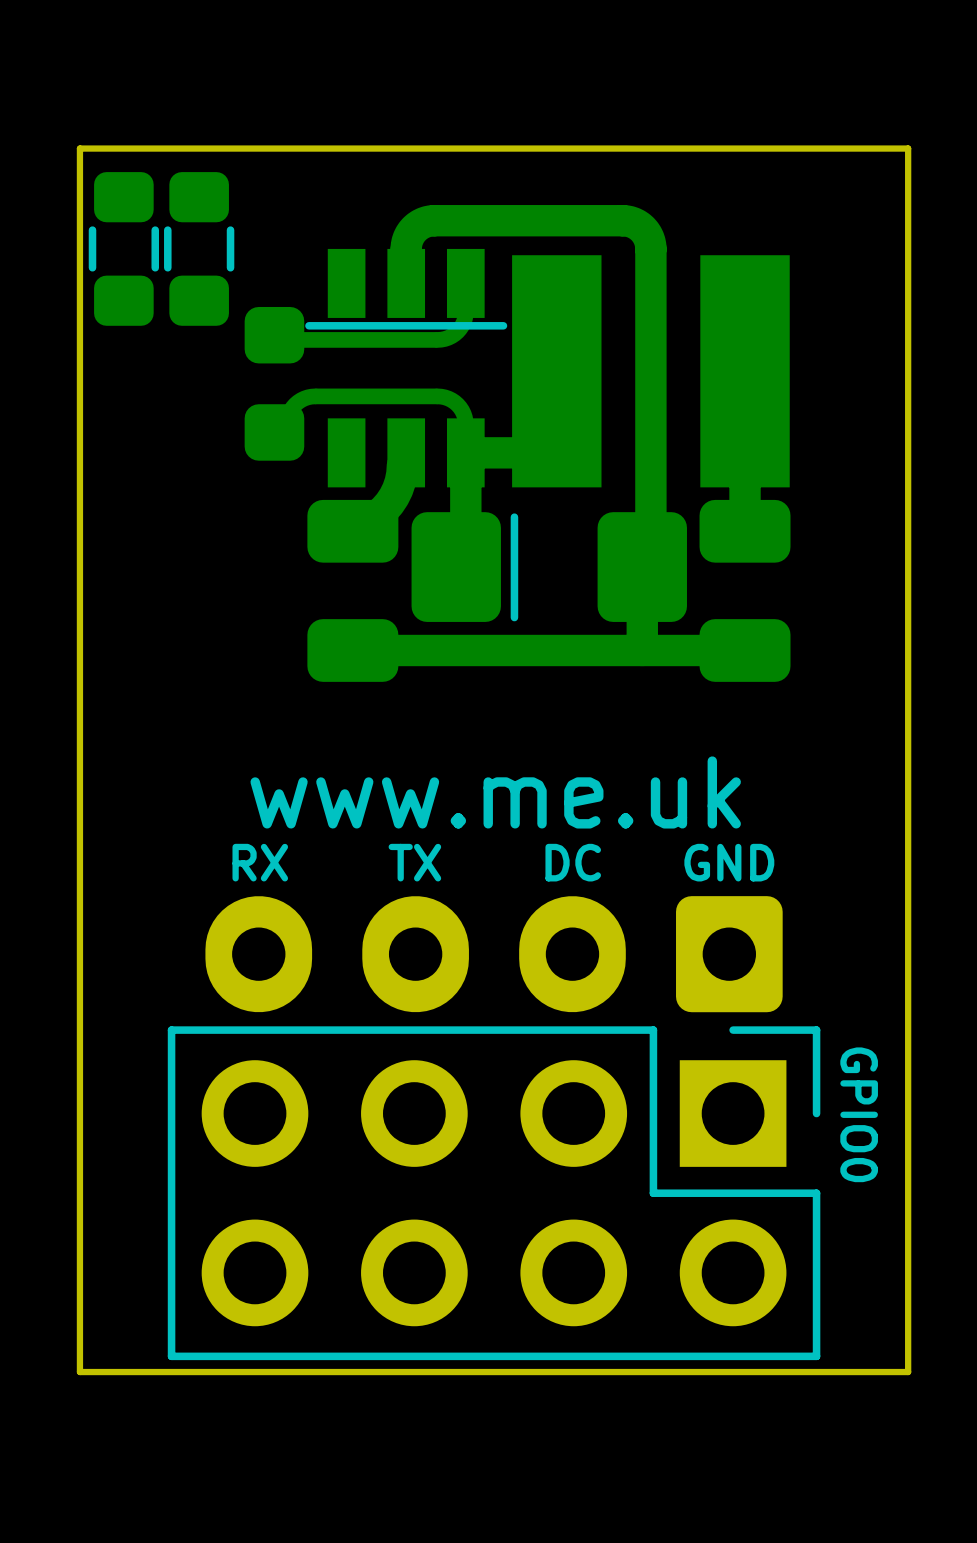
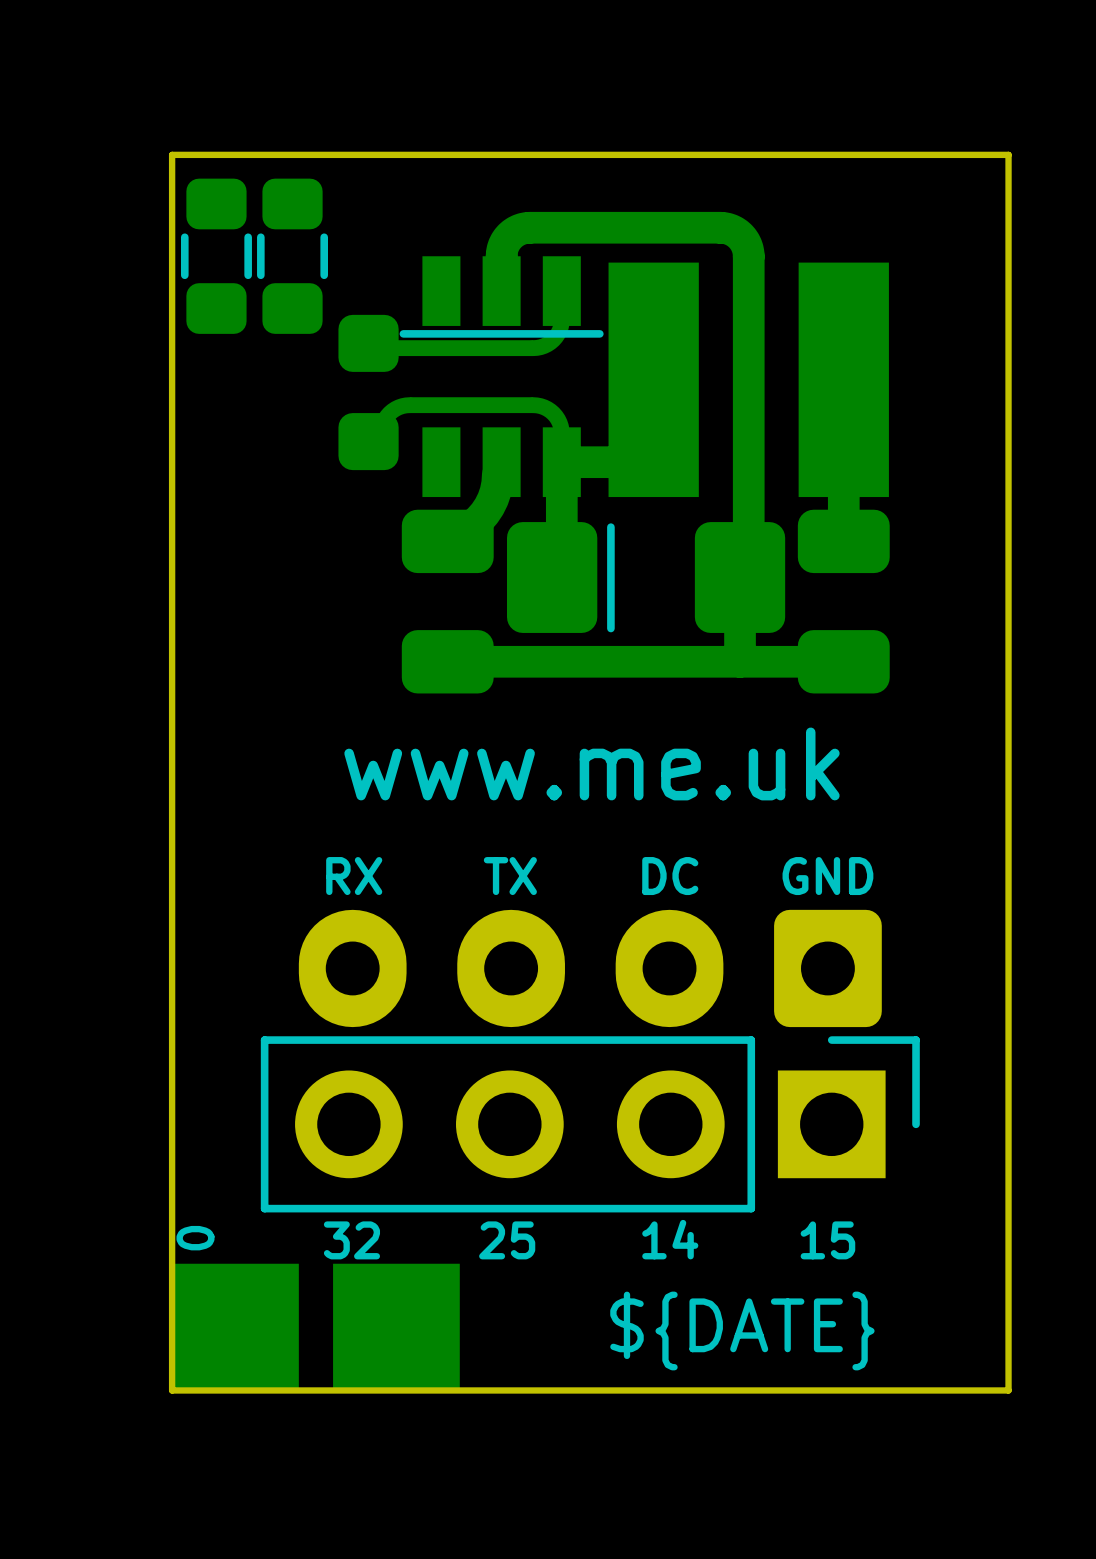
text position: www.me.uk (495, 792) -> www.me.uk (591, 763)
part: none -> (590, 1124)
text: GPIO0 (859, 1114) -> none
part: (494, 1193) -> none
text: none -> 0 (195, 1238)
text: none -> 14 (670, 1239)
text: none -> 32 (351, 1240)
text: none -> 25 (507, 1240)
text: none -> 15 (827, 1240)
part: none -> (315, 1327)
text: none -> ${DATE} (742, 1330)

